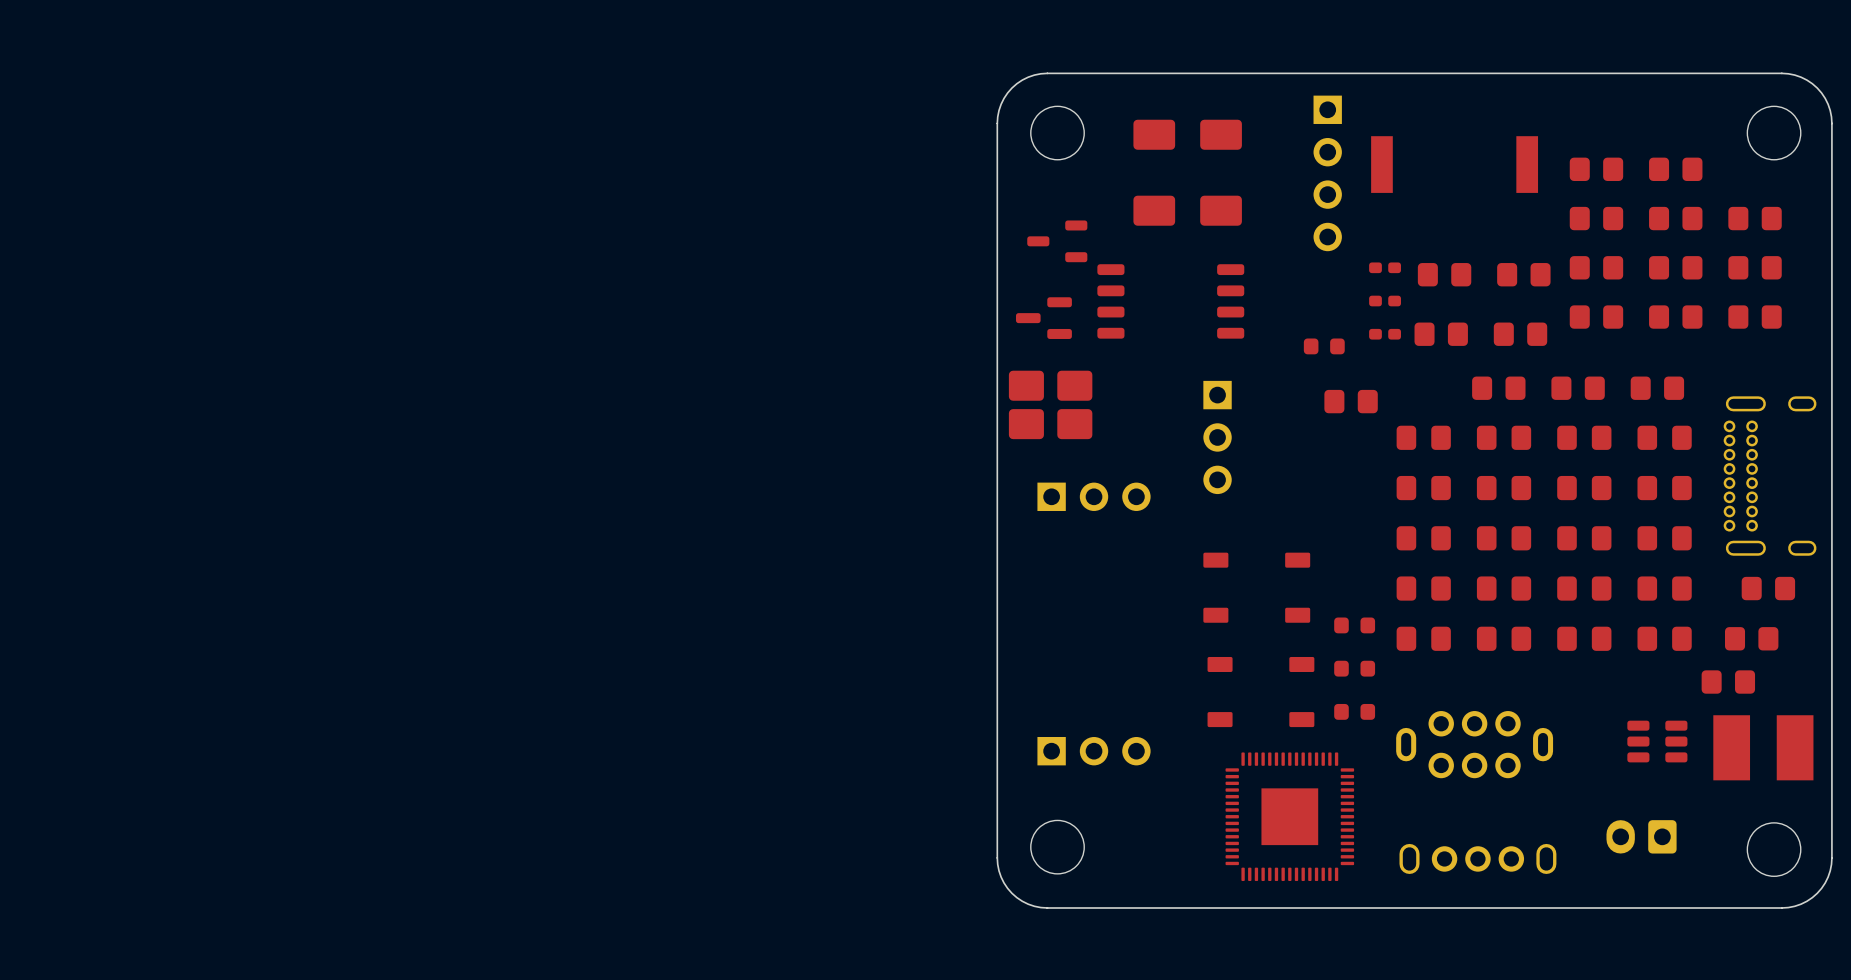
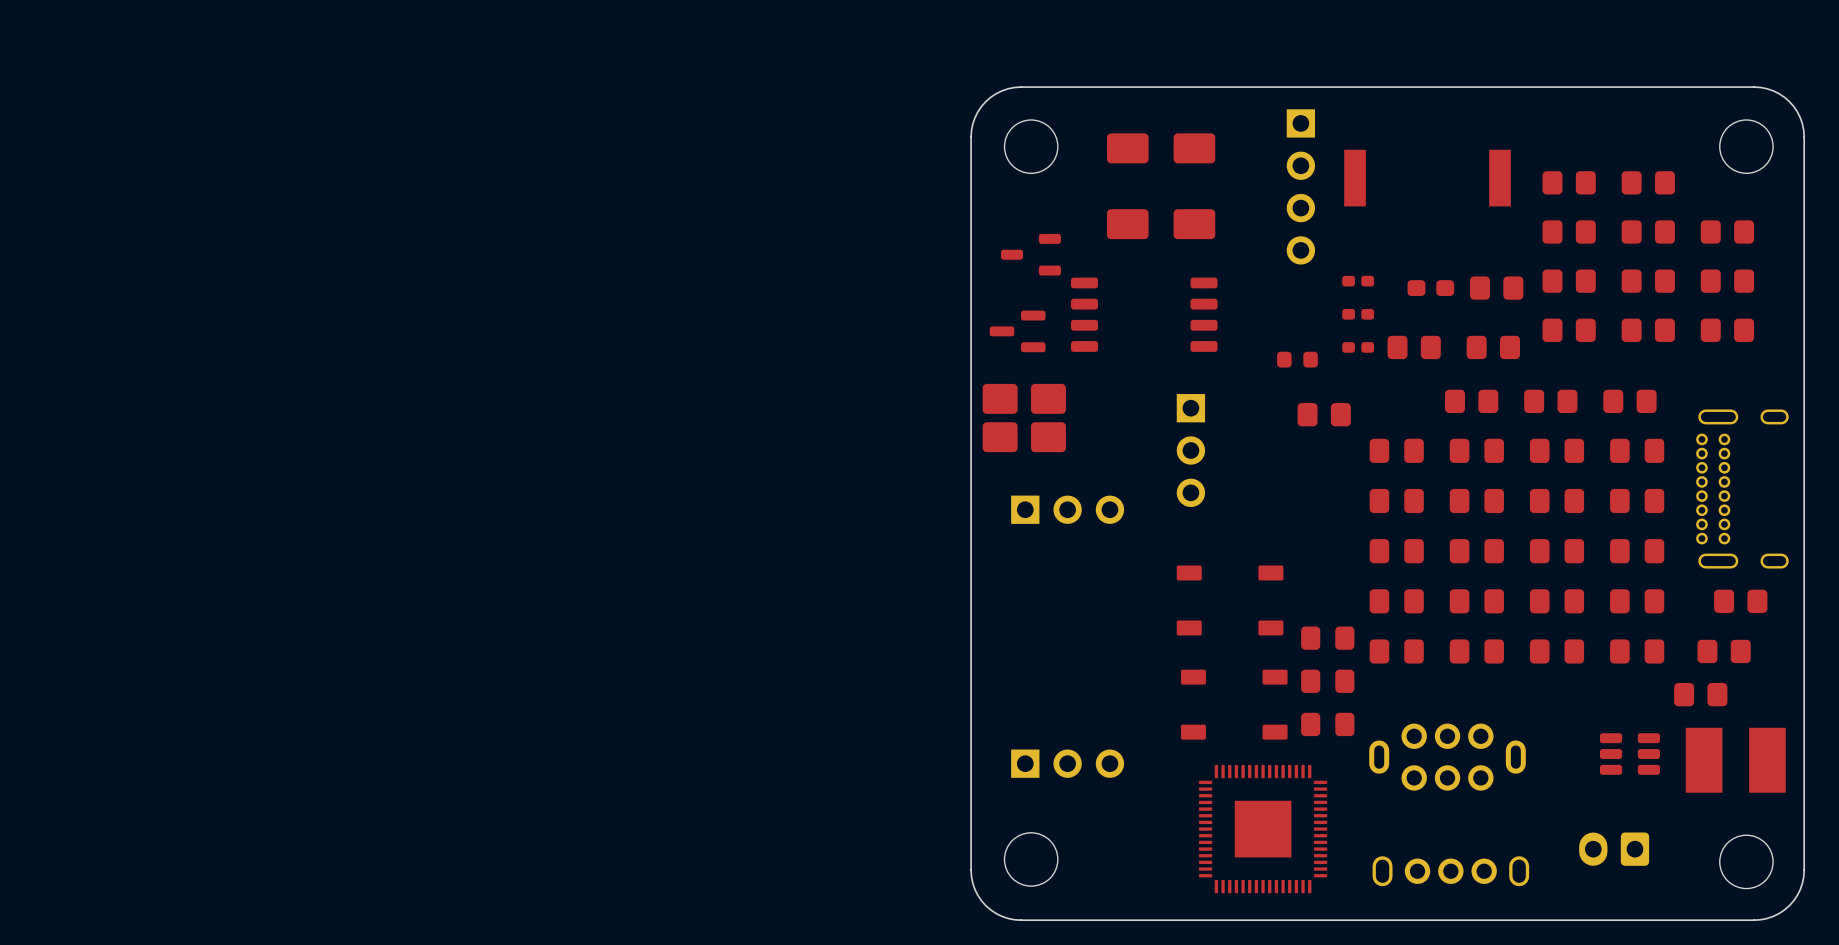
part footprint: [1417, 263, 1472, 287] -> [1407, 280, 1455, 296]
part footprint: [1334, 617, 1376, 634] -> [1301, 626, 1355, 650]
part footprint: [1334, 660, 1376, 677] -> [1301, 669, 1355, 693]
part footprint: [1334, 703, 1376, 720] -> [1301, 712, 1355, 737]

